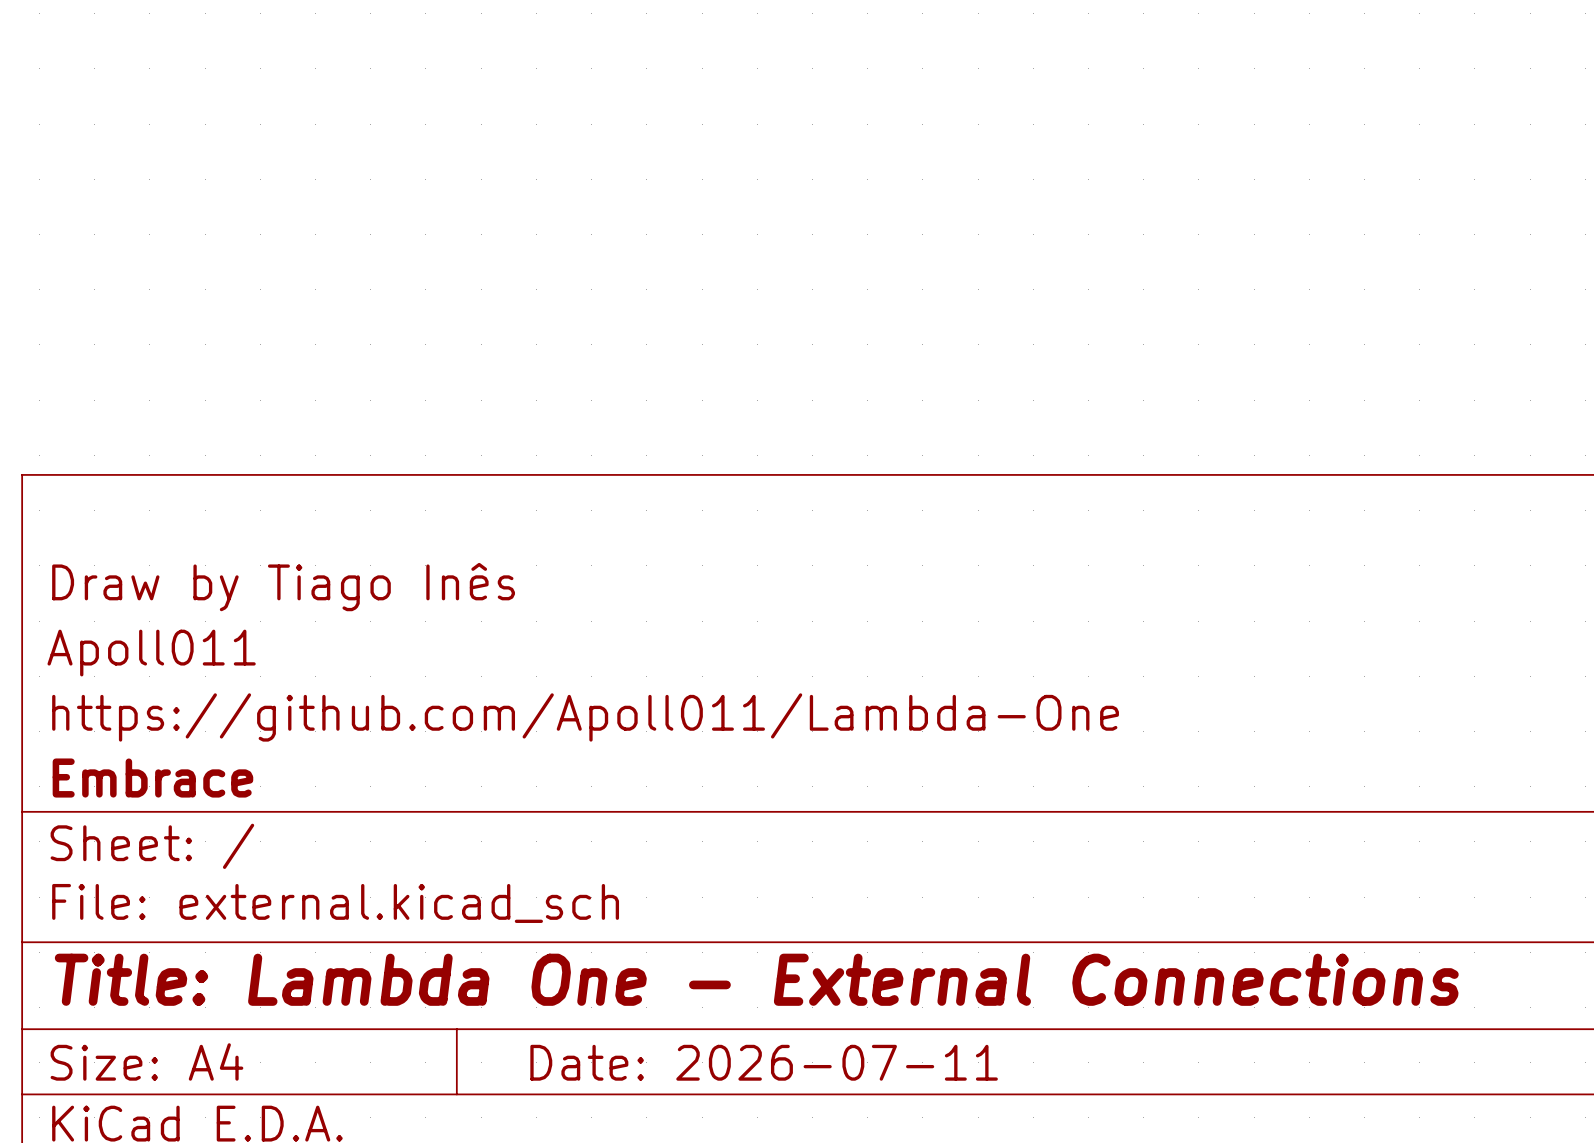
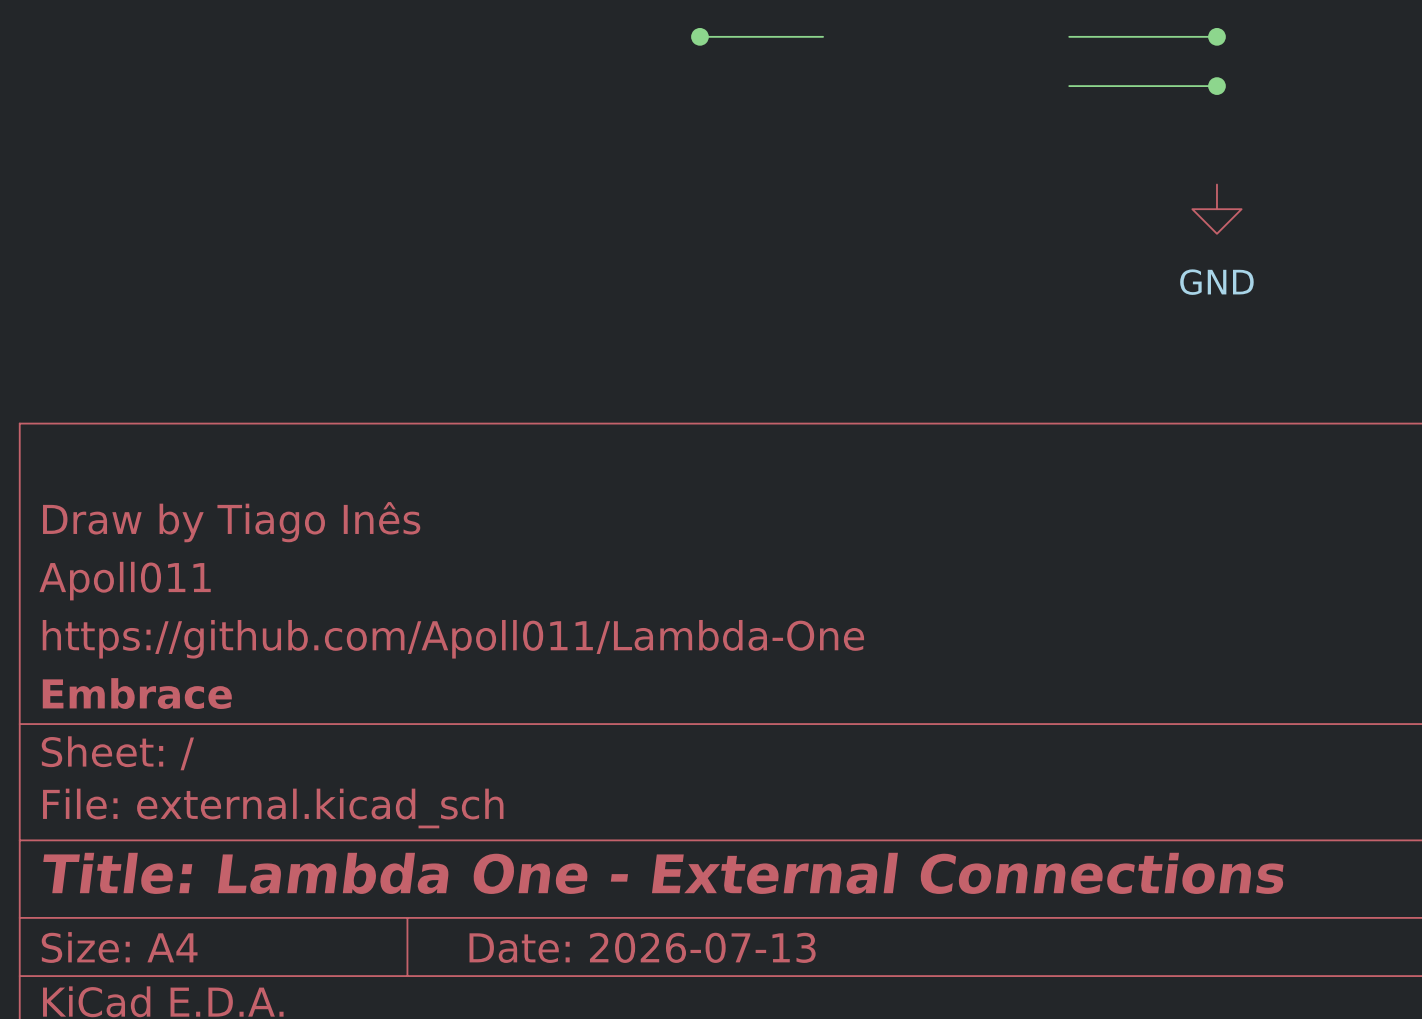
wire: none -> (699, 36) (823, 36)
junction: none -> (699, 36)
wire: none -> (1069, 36) (1216, 36)
junction: none -> (1216, 36)
wire: none -> (1069, 86) (1216, 86)
junction: none -> (1216, 86)
power symbol: none -> GND (1216, 209)
title block: Date: 2026-07-11 (764, 1062) -> Date: 2026-07-13 (642, 947)

